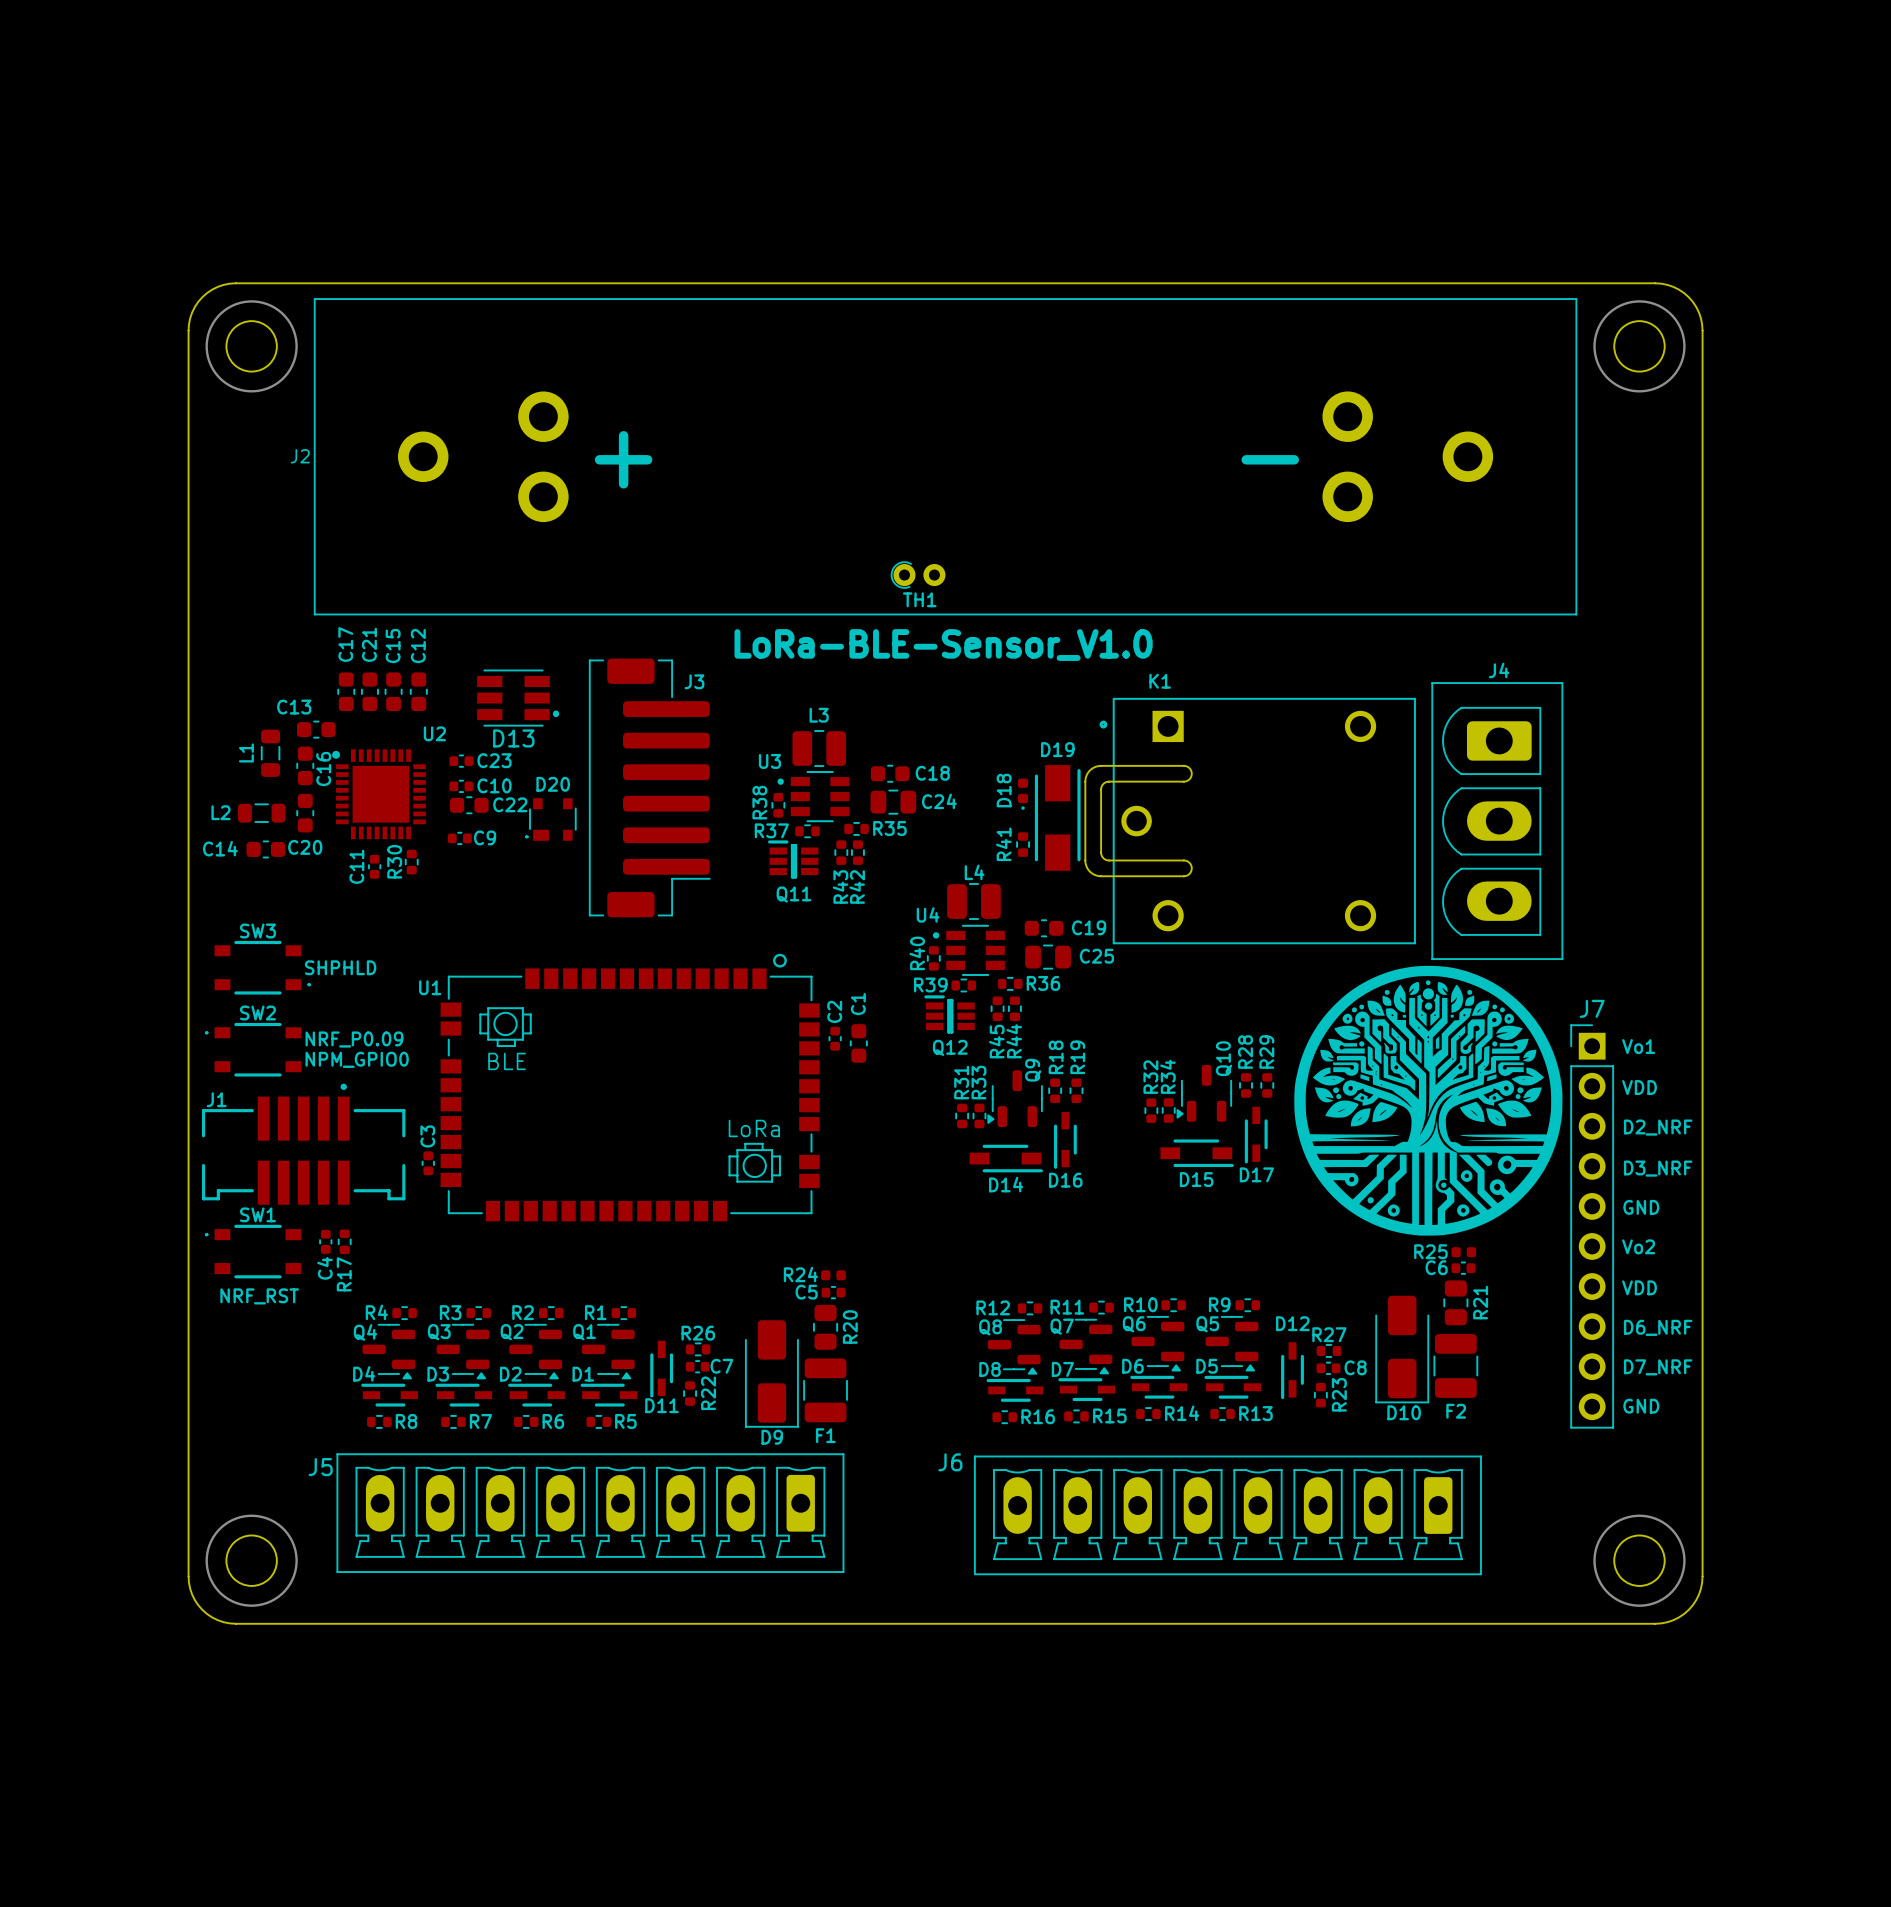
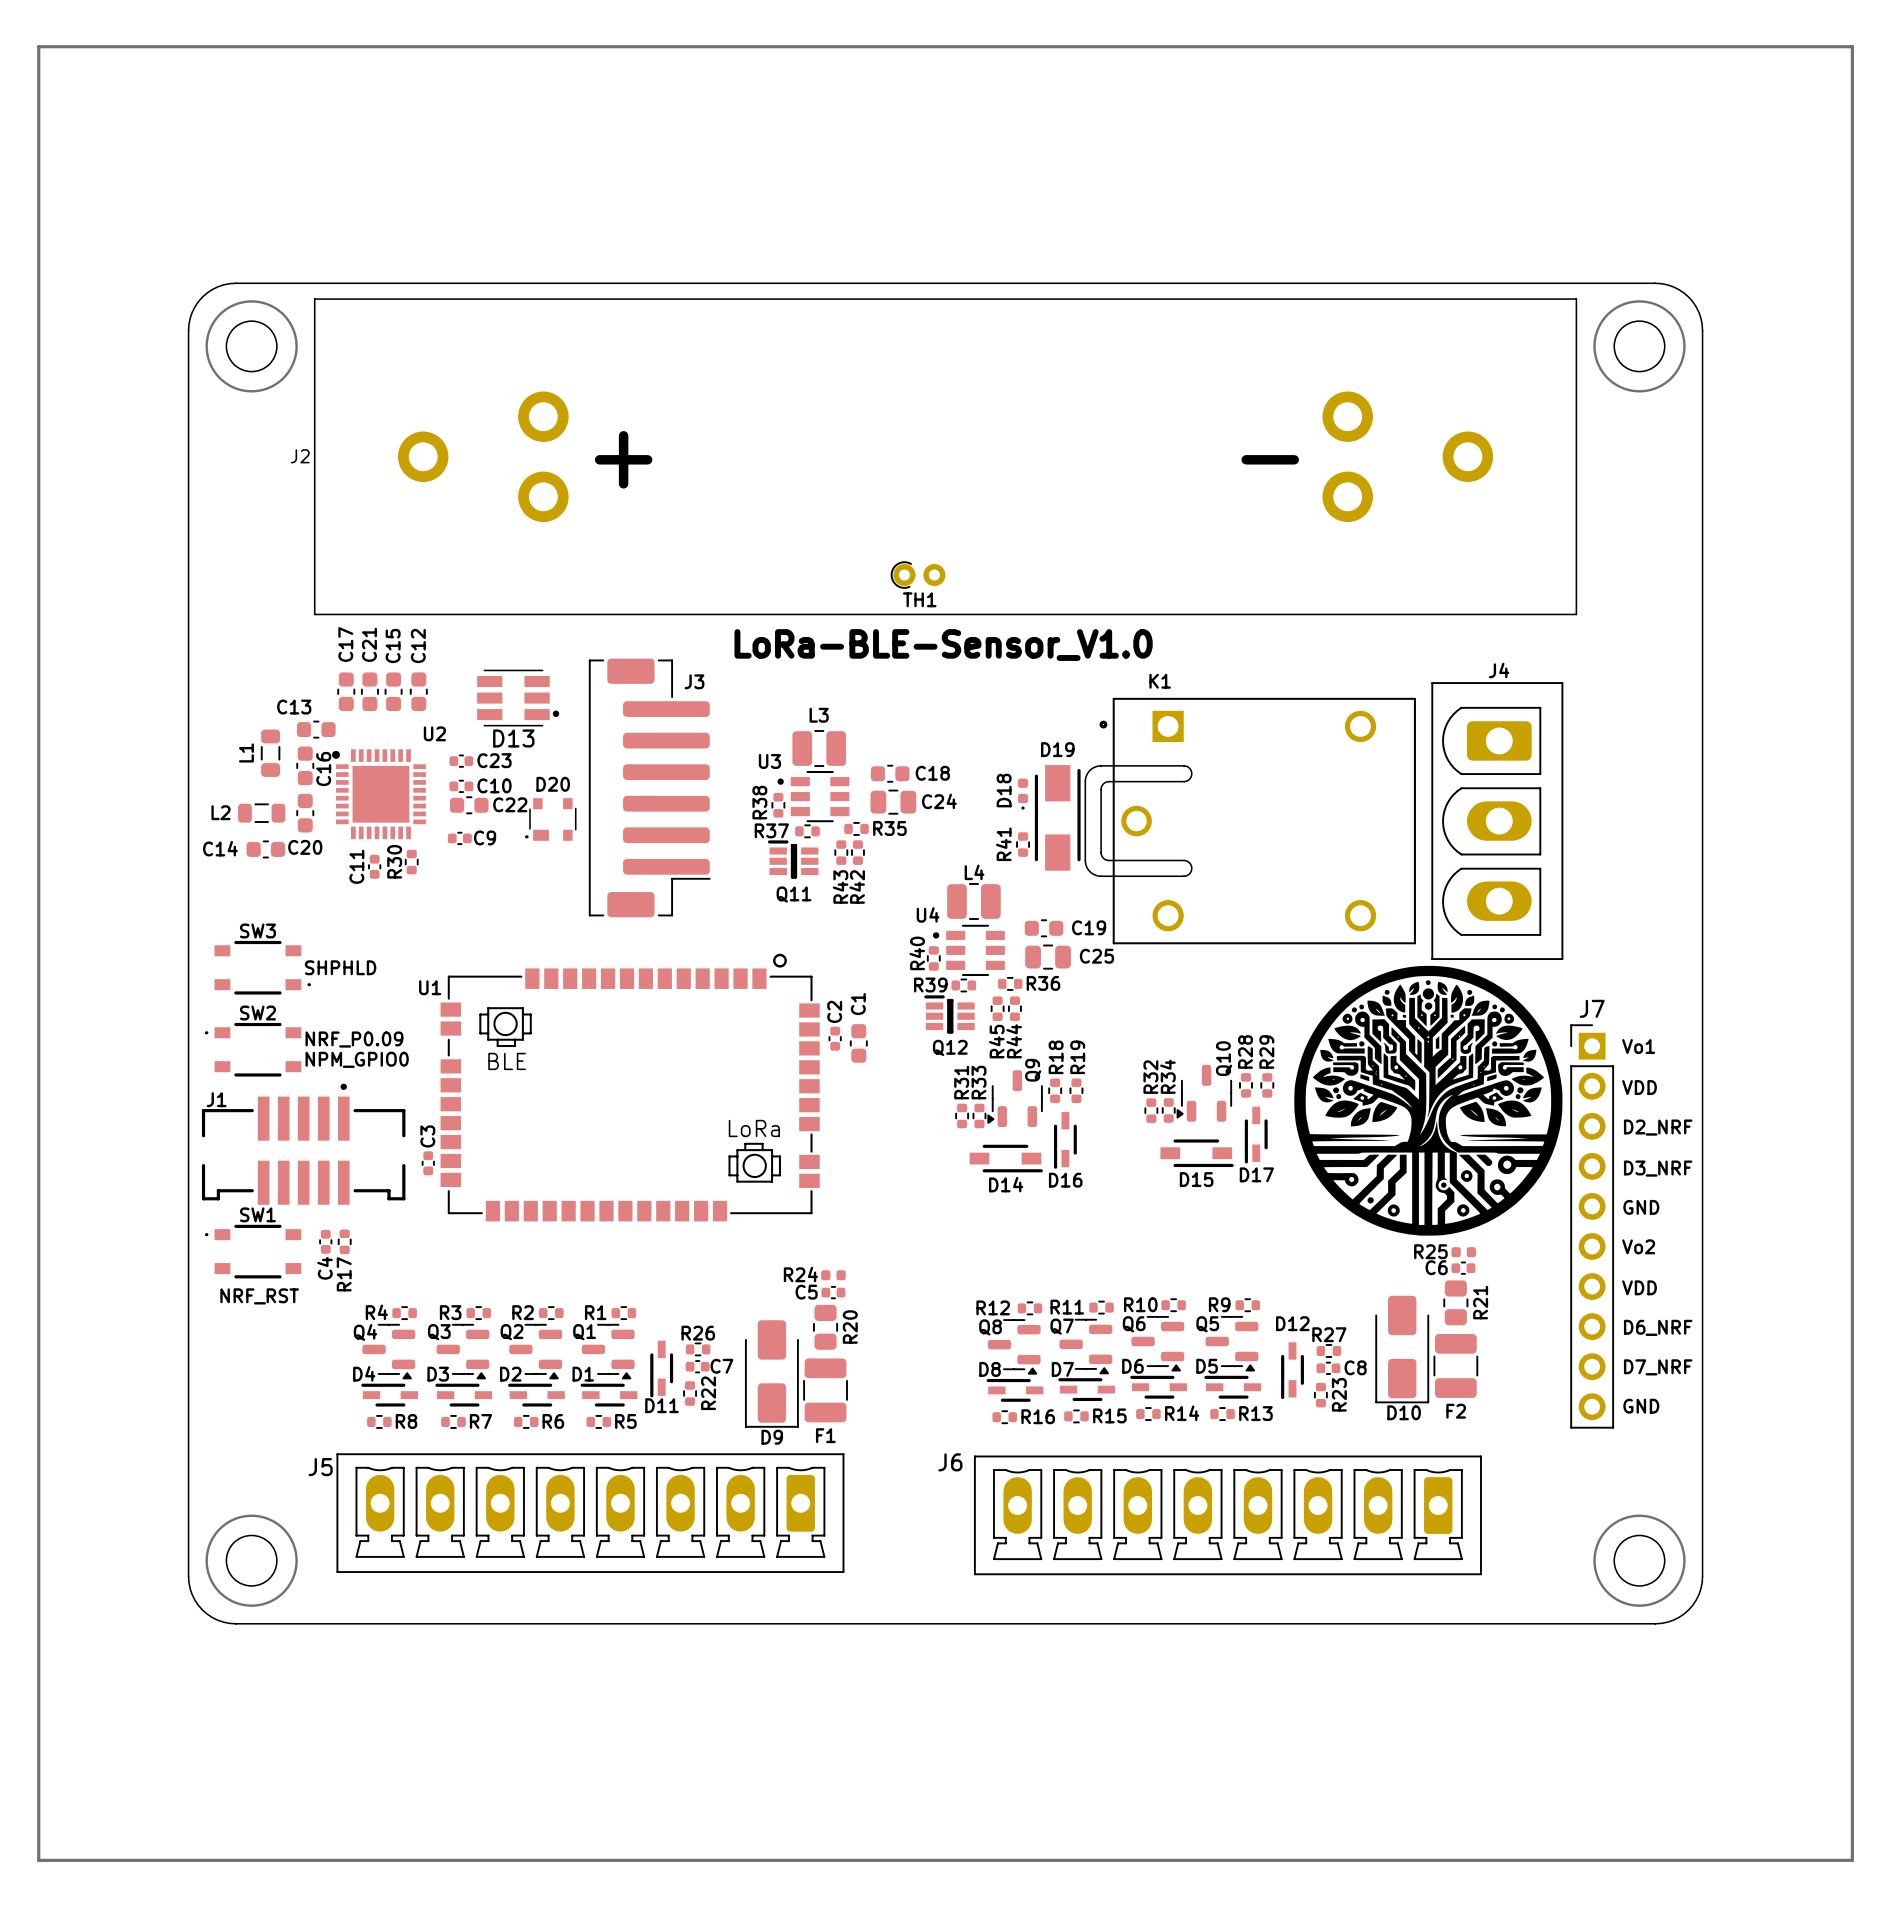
line: none -> (38, 46) (1852, 46) (1852, 1860) (38, 1860) (38, 46)

